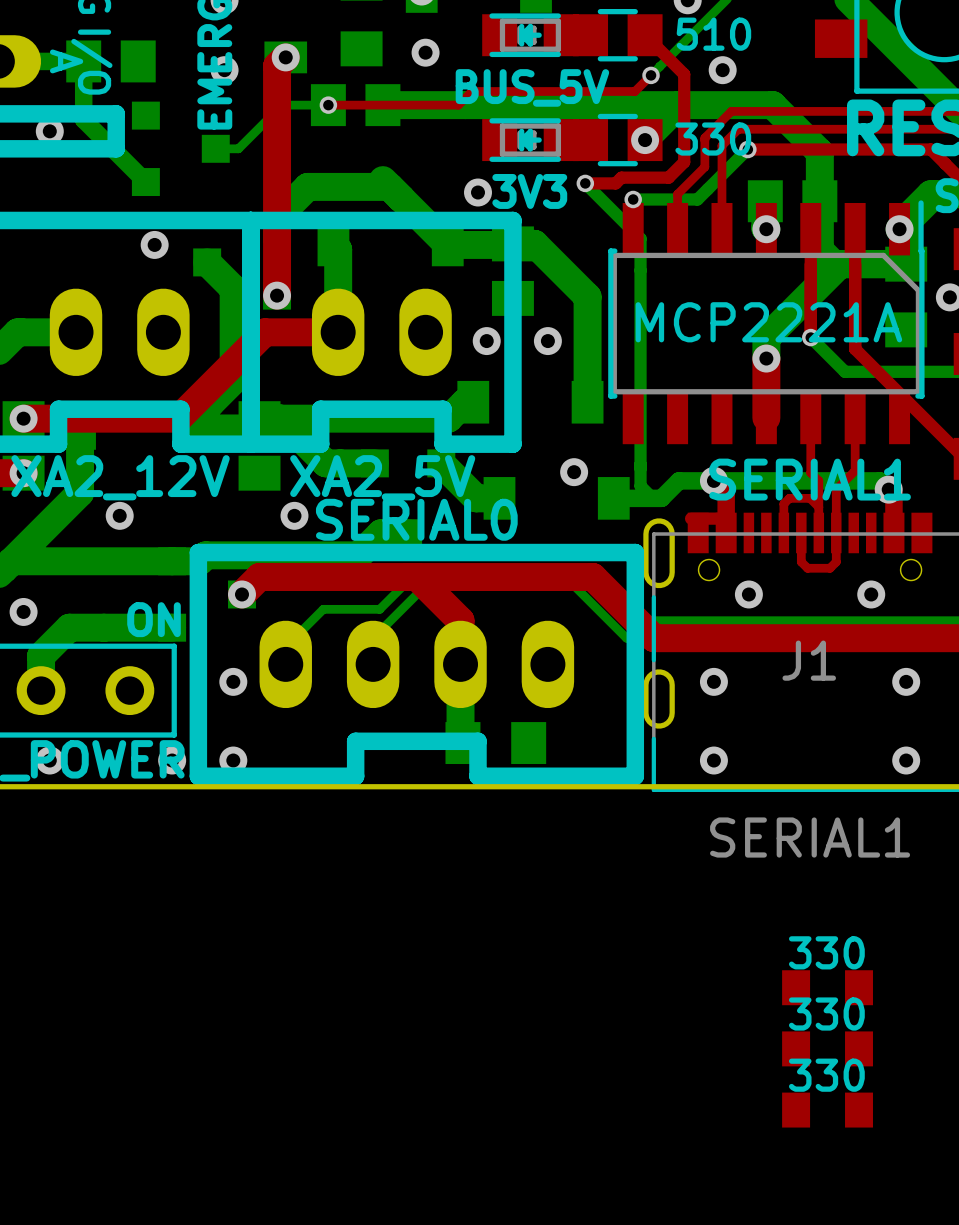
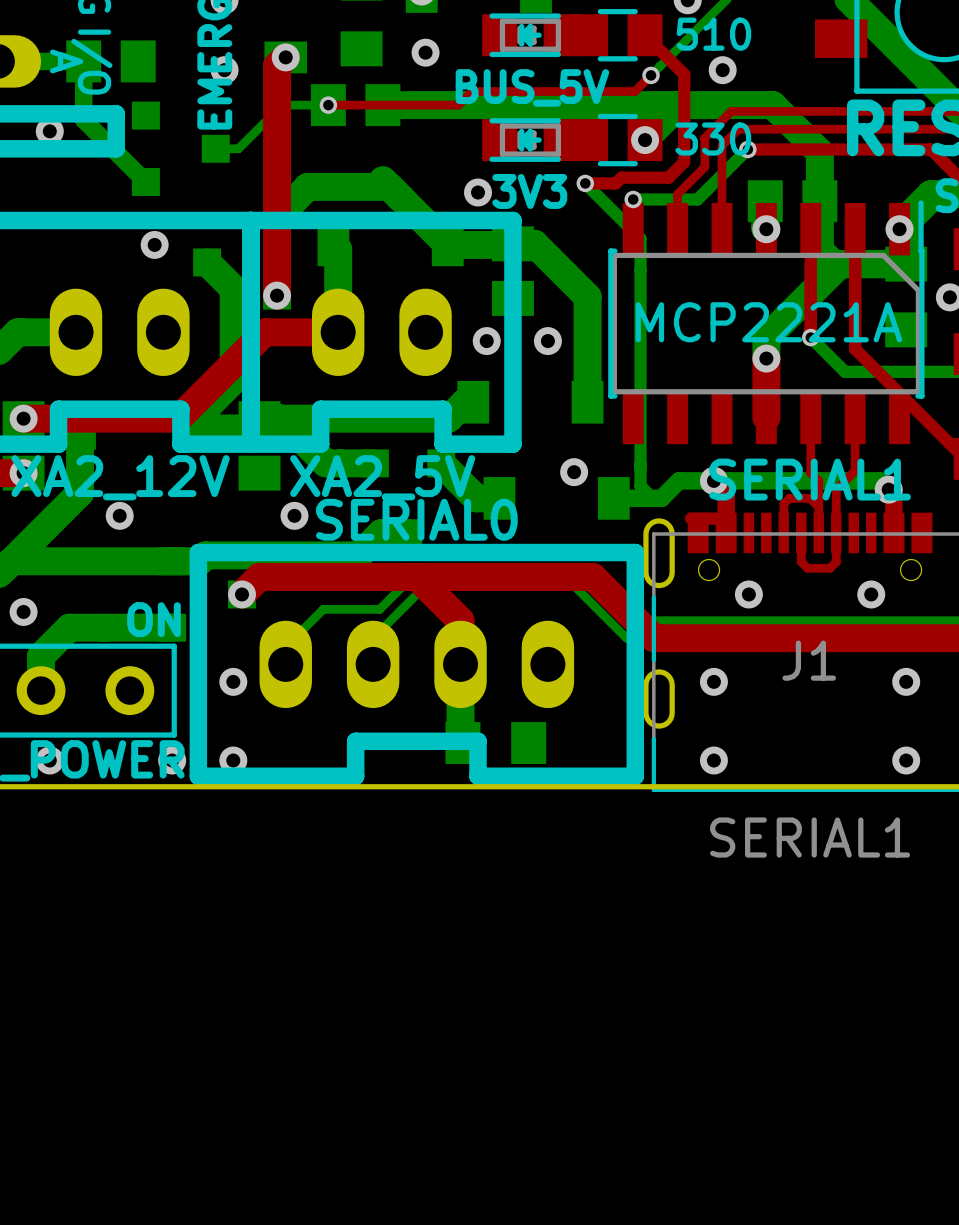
part: 330 (827, 987) -> none
part: 330 (827, 1048) -> none
part: 330 (827, 1110) -> none

